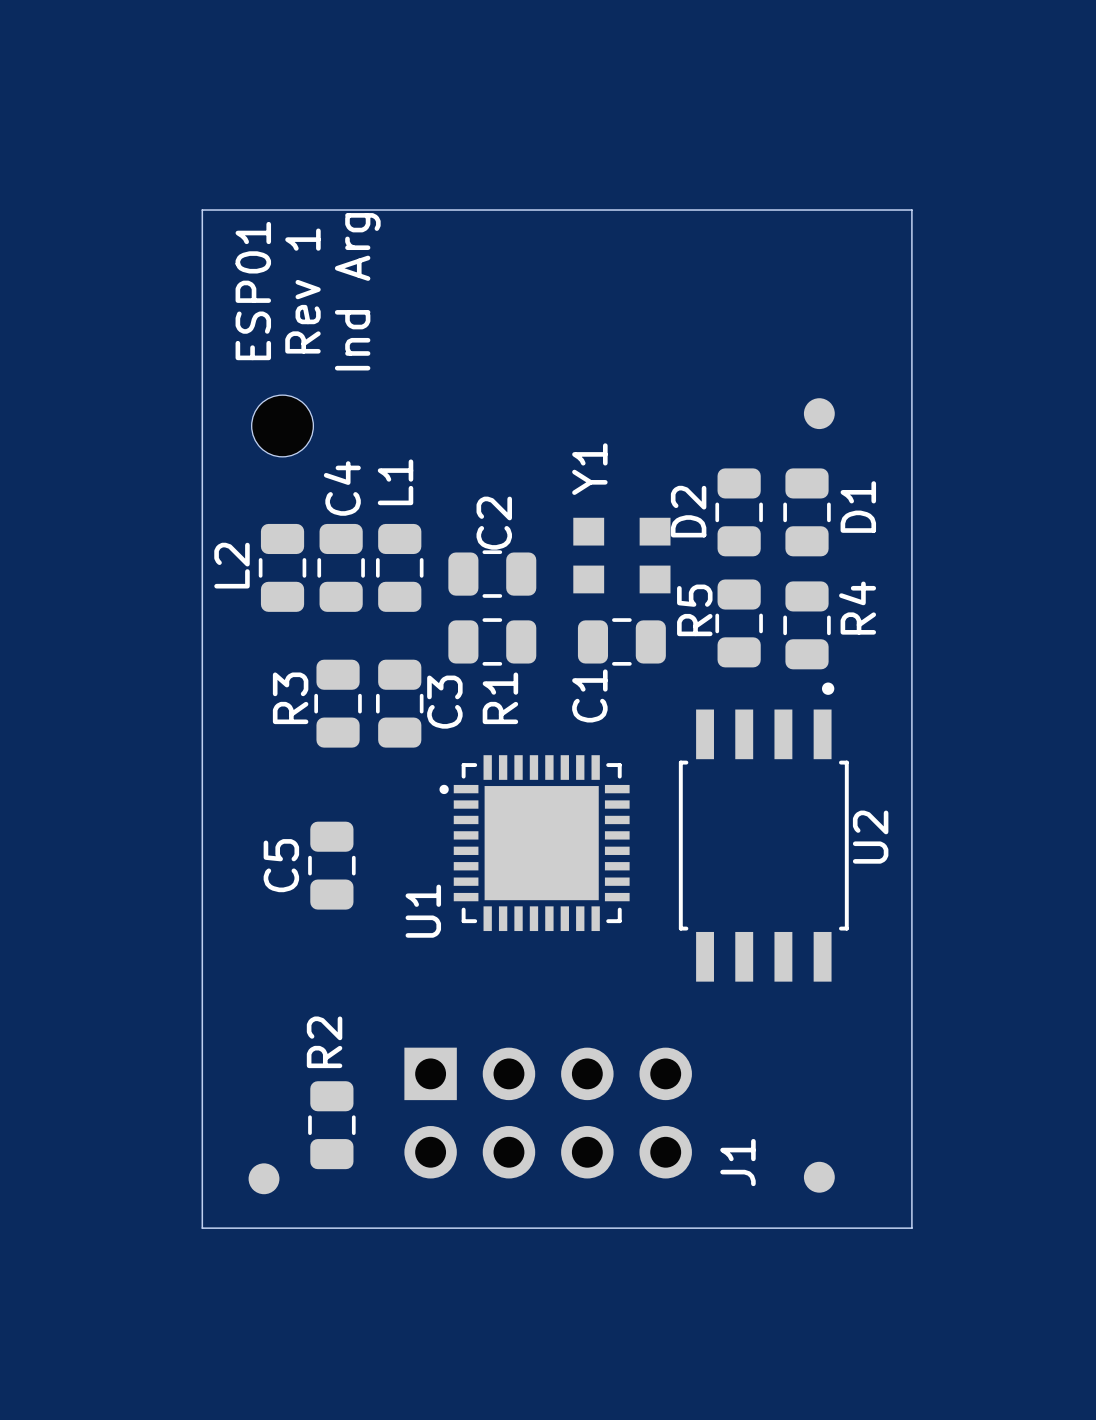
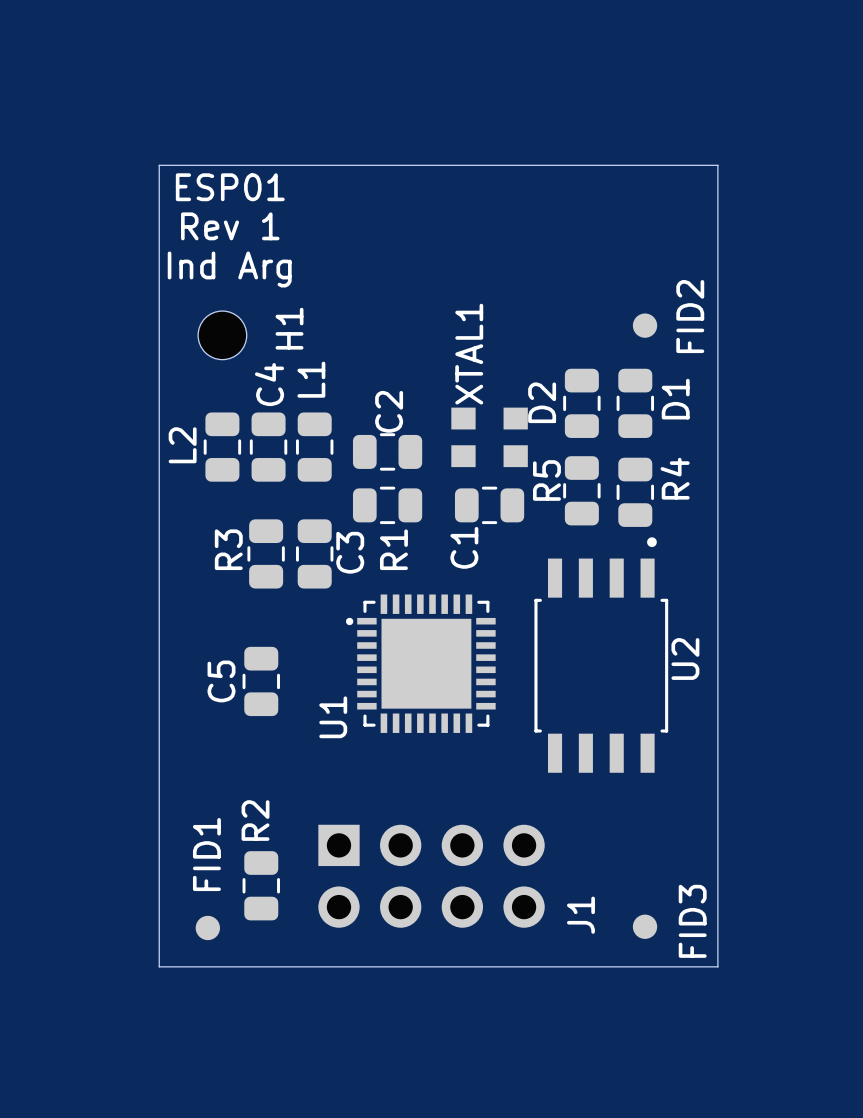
text rotation: 0° (253, 291) -> 90° clockwise (230, 187)
text rotation: 0° (302, 291) -> 90° clockwise (230, 226)
text rotation: 0° (357, 291) -> 90° clockwise (229, 269)
FID2 name: none -> FID2 (690, 316)
H1 name: none -> H1 (289, 328)
Y1 name: Y1 (589, 469) -> XTAL1 (469, 354)
FID1 name: none -> FID1 (206, 854)
FID3 name: none -> FID3 (692, 921)

